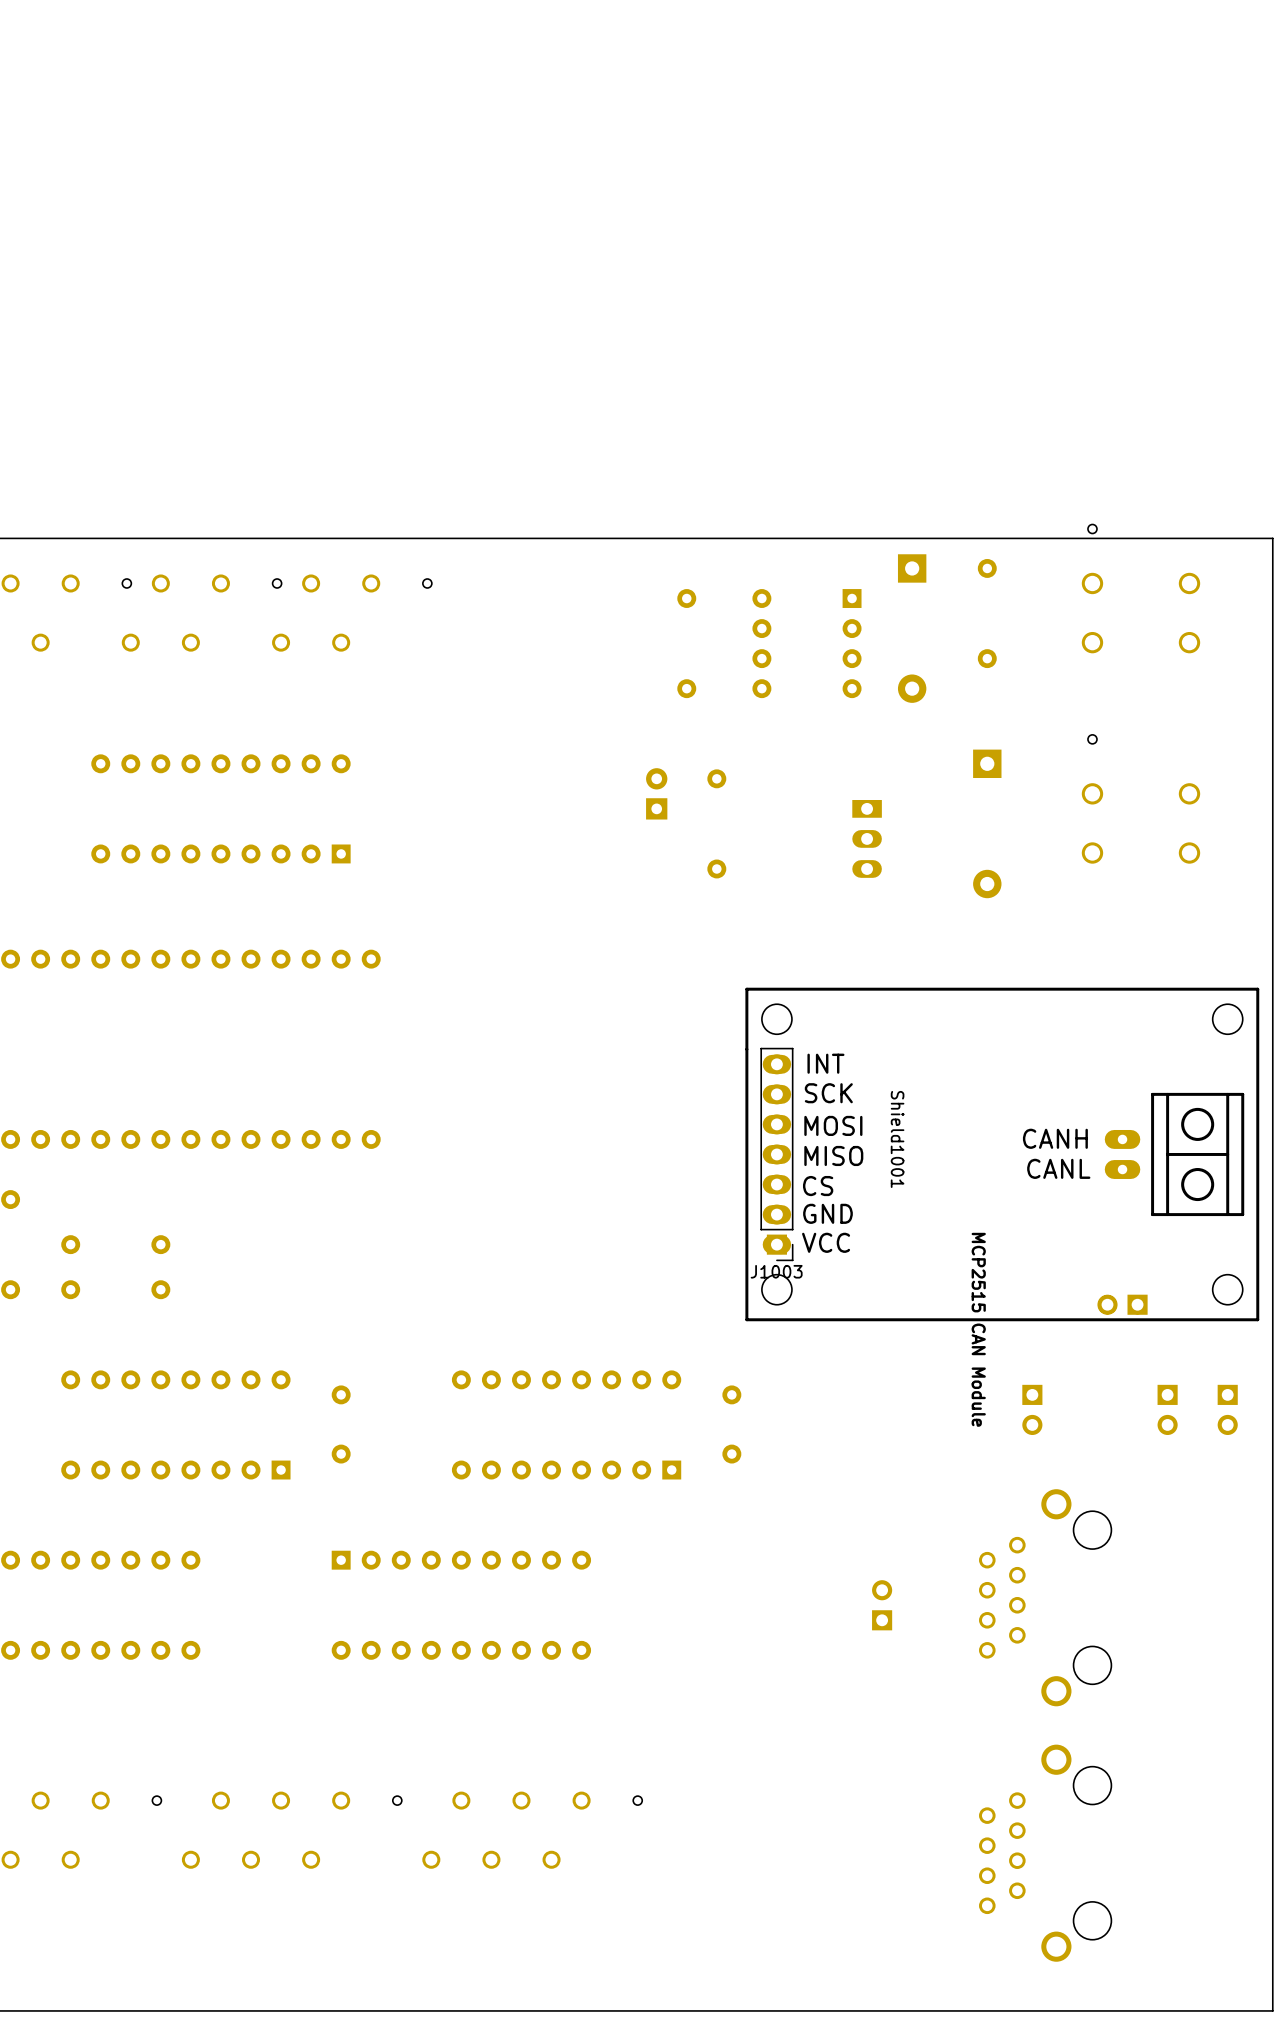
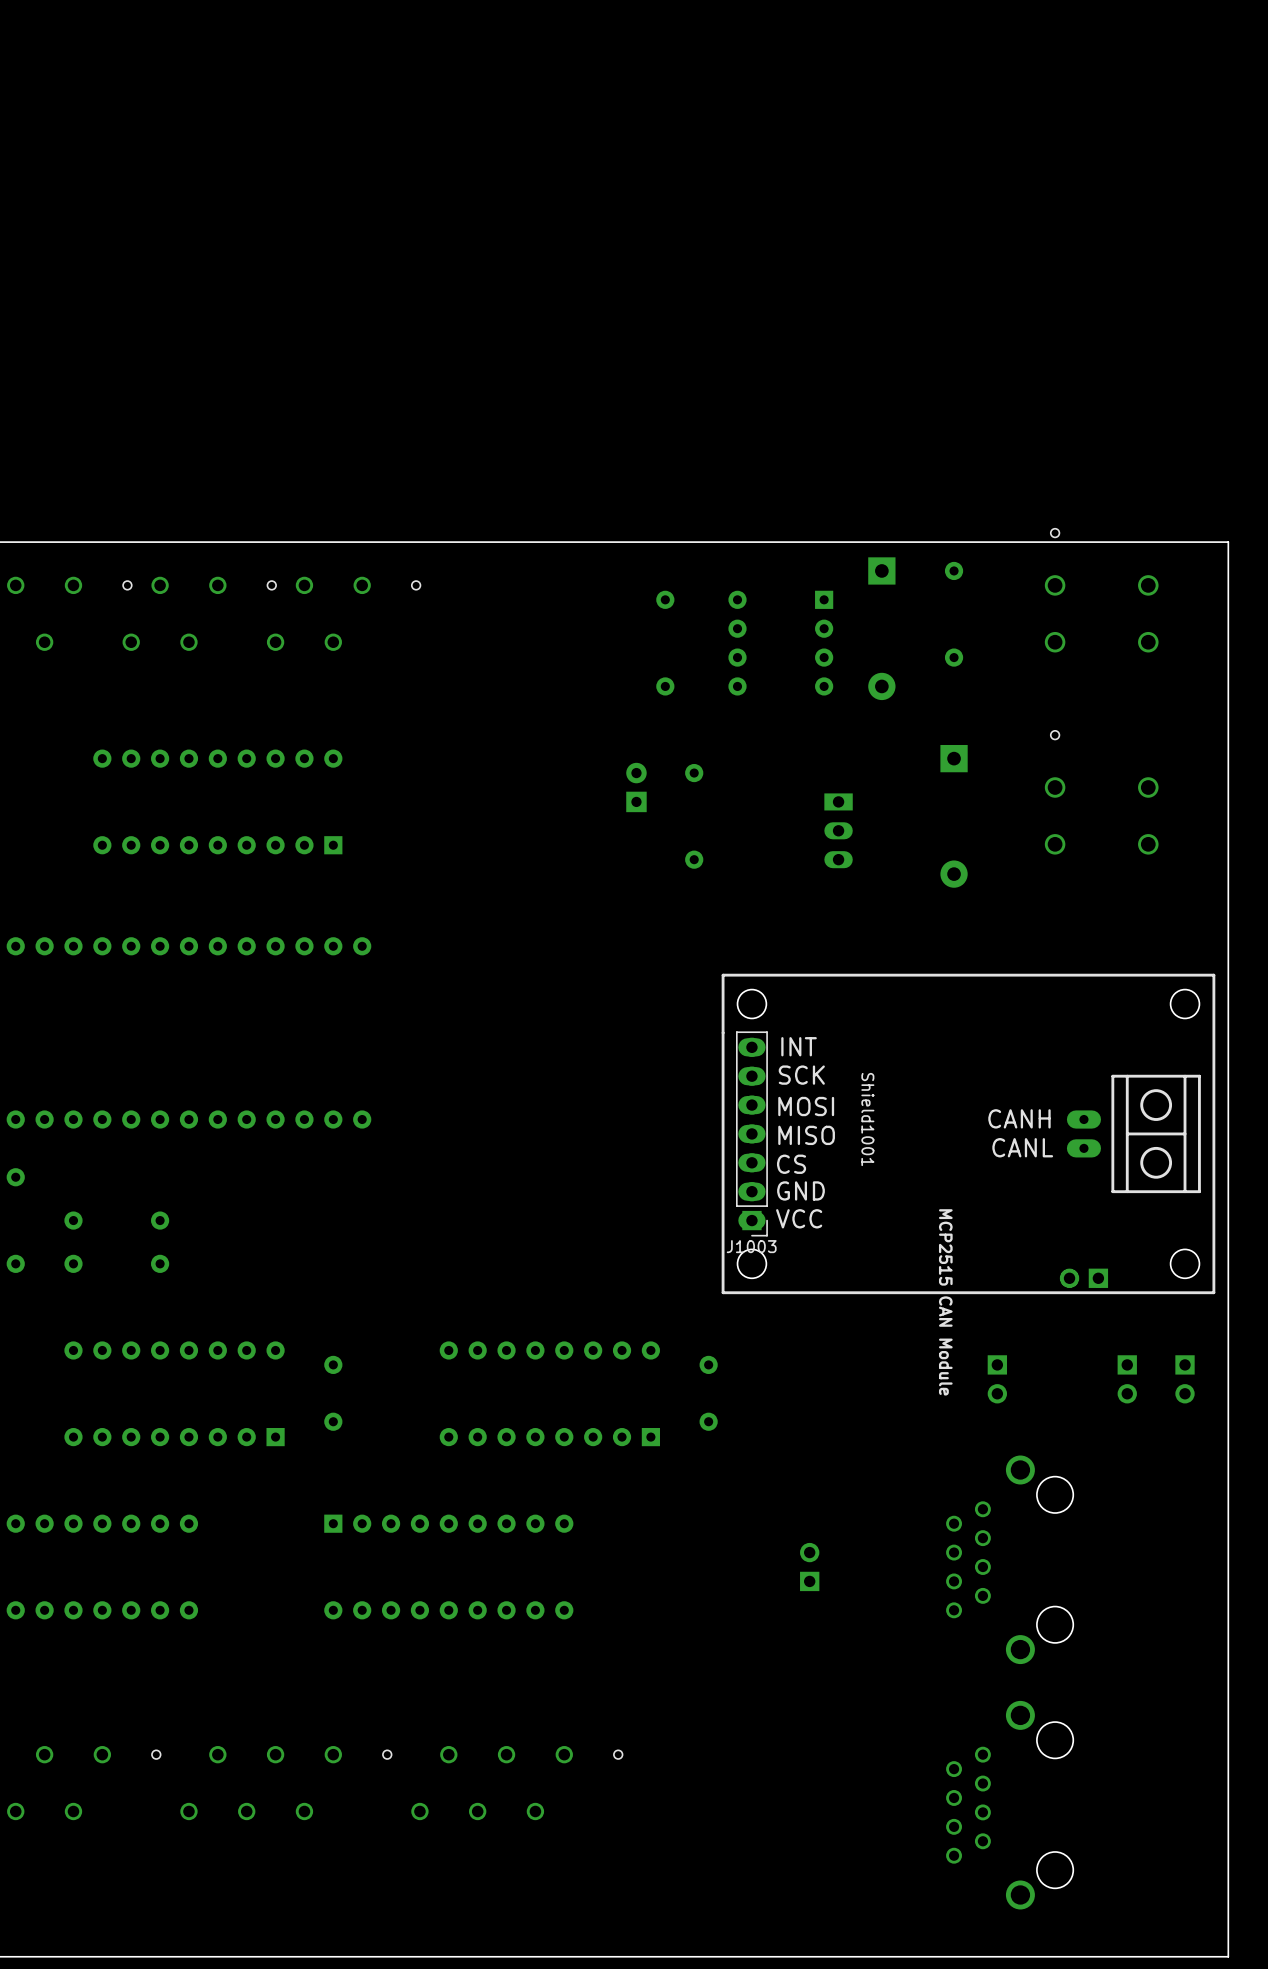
part position: (882, 1605) -> (809, 1567)

